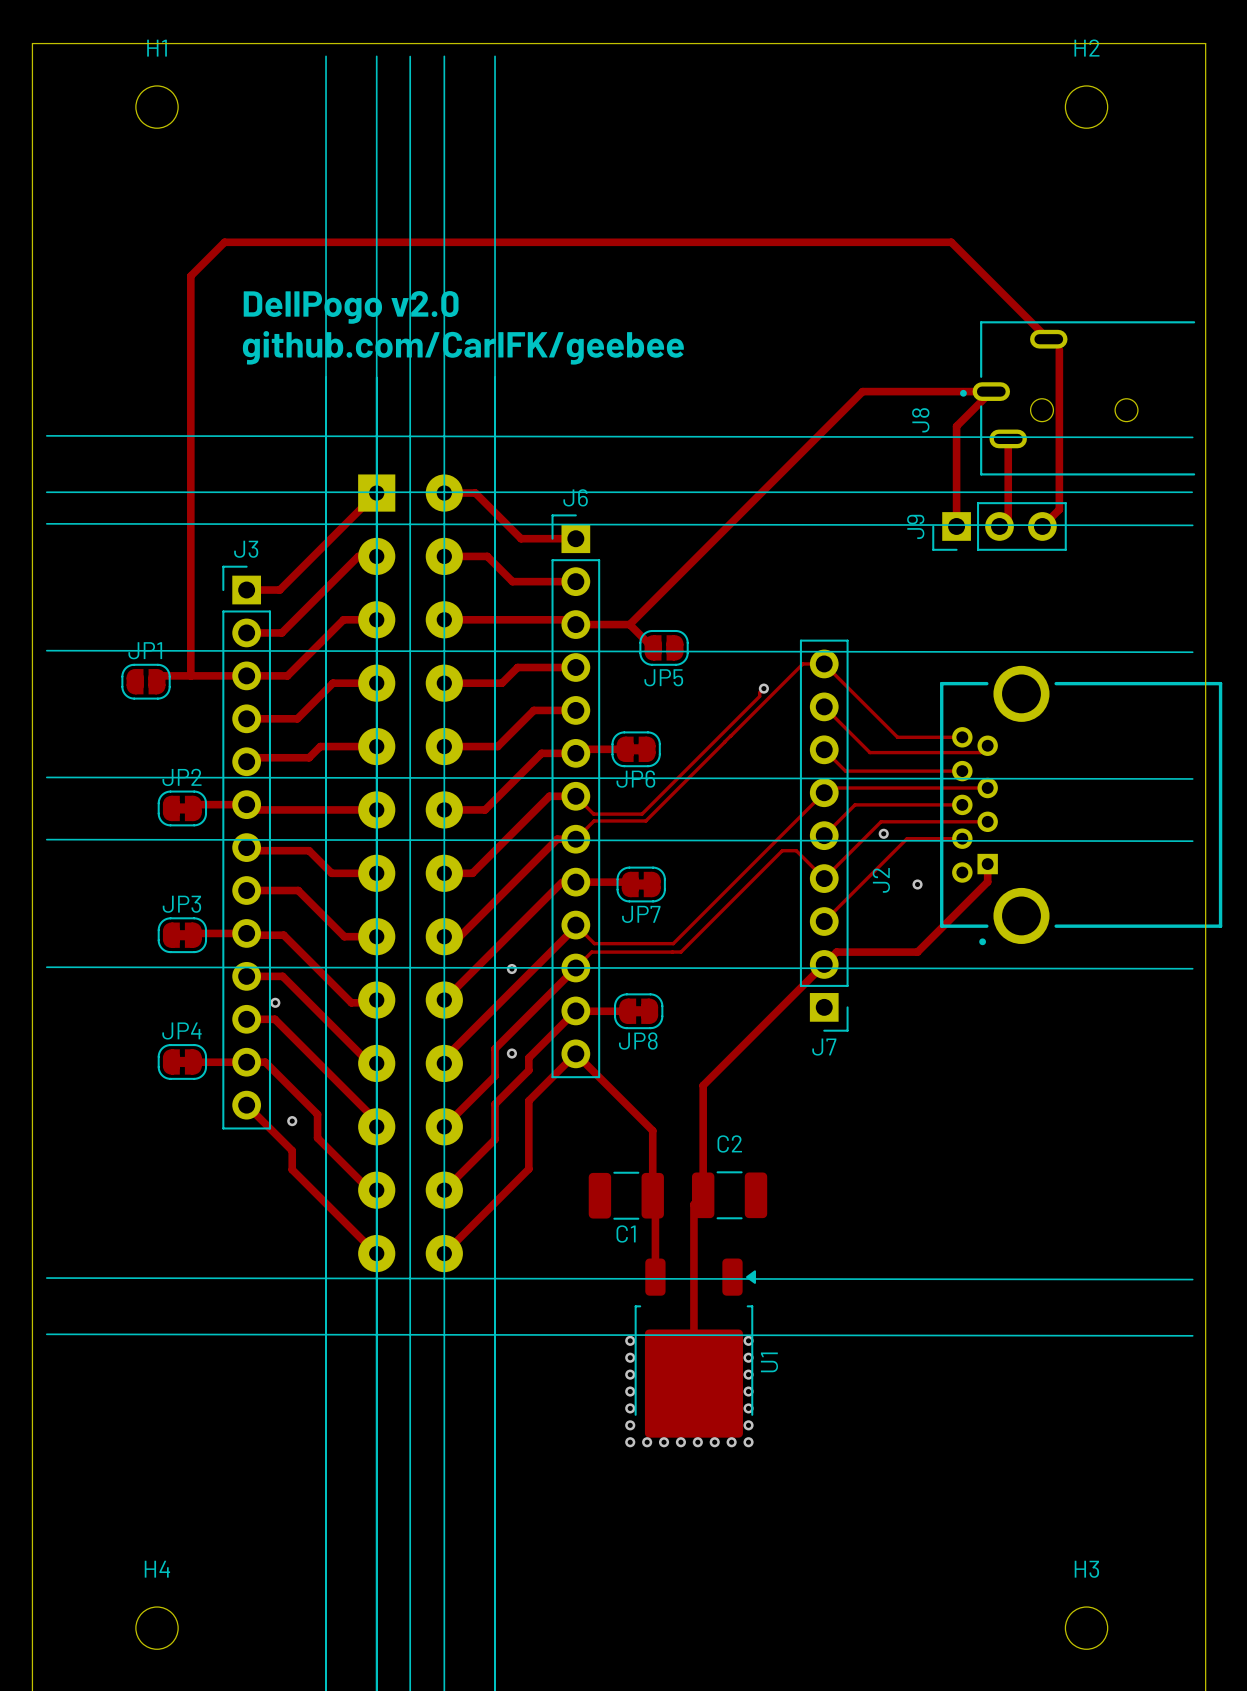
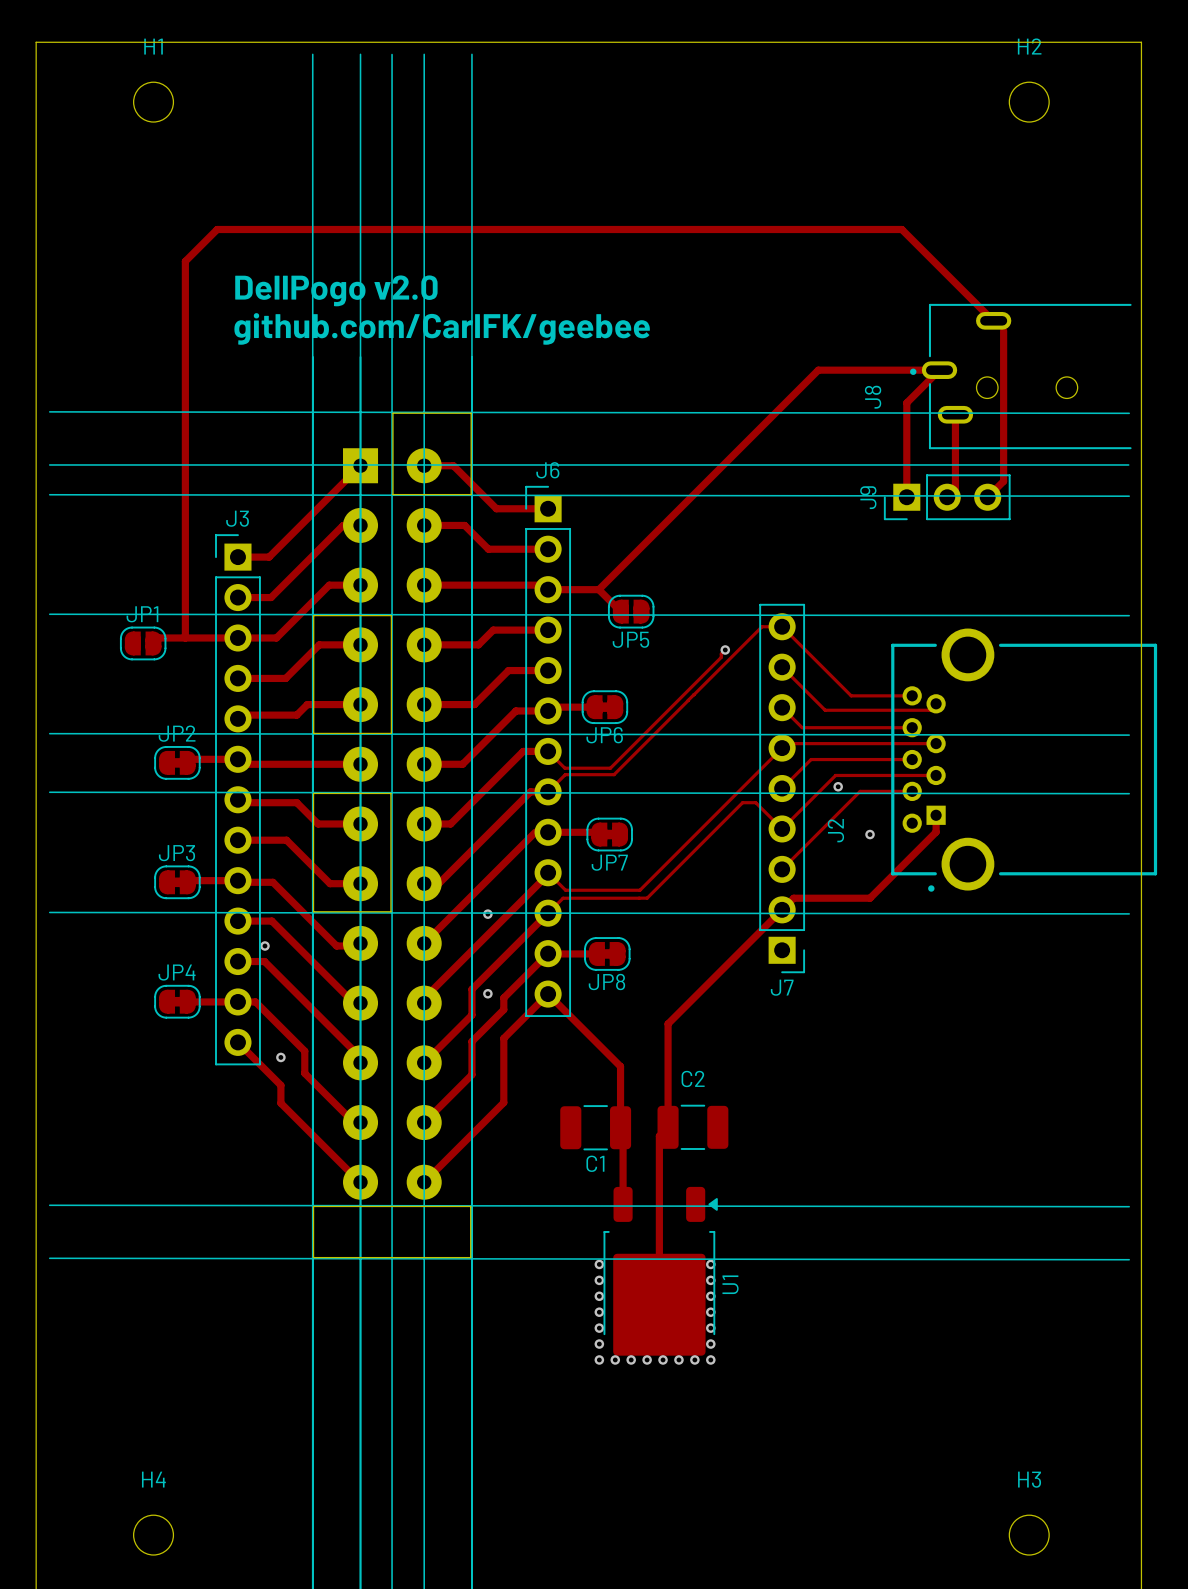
board edge: none -> (392, 413) (471, 413) (471, 494) (392, 494) (392, 413)
board edge: none -> (313, 615) (391, 615) (391, 733) (313, 733) (313, 615)
board edge: none -> (313, 793) (313, 911) (390, 911) (390, 793) (313, 793)
board edge: none -> (313, 1206) (470, 1206) (470, 1257) (313, 1257) (313, 1206)

